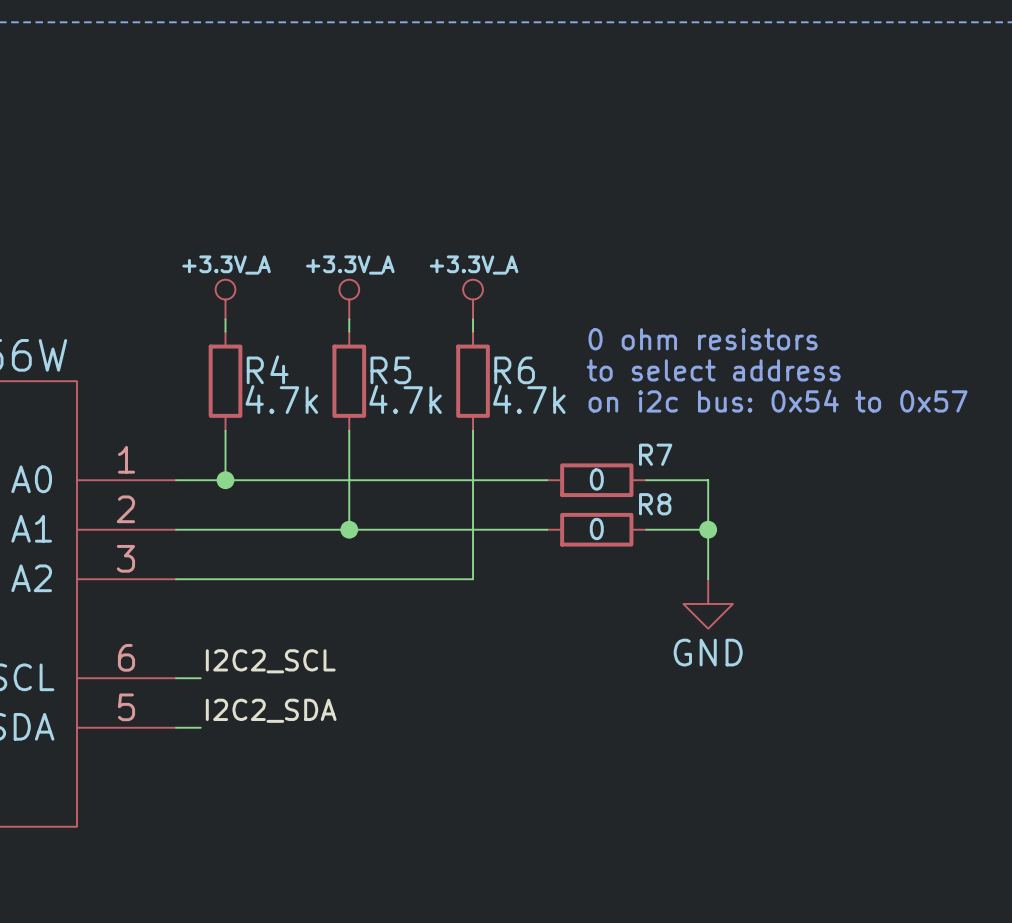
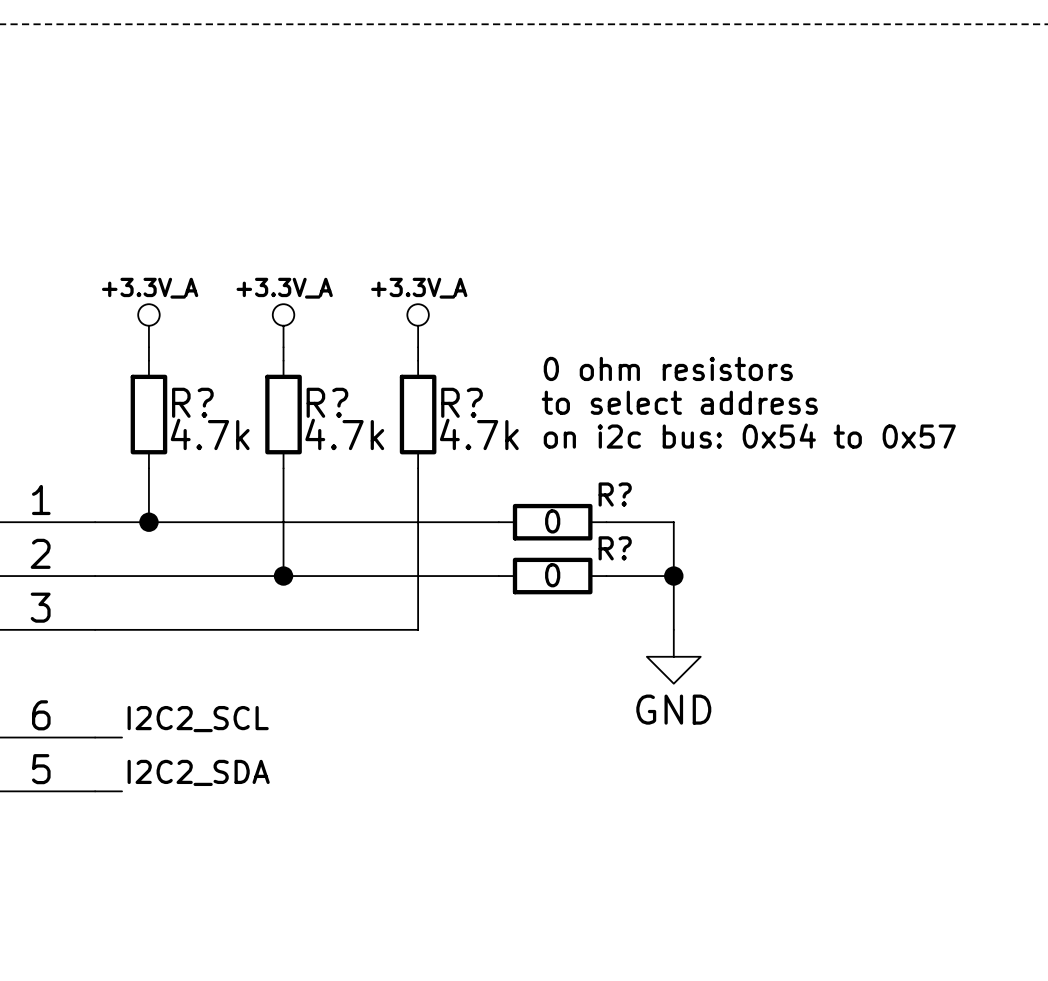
R4 name: R4 (267, 369) -> R? (192, 402)
R5 name: R5 (390, 370) -> R? (327, 402)
R6 name: R6 (514, 370) -> R? (462, 402)
R7 name: R7 (655, 454) -> R? (615, 494)
R8 name: R8 (655, 504) -> R? (615, 548)

